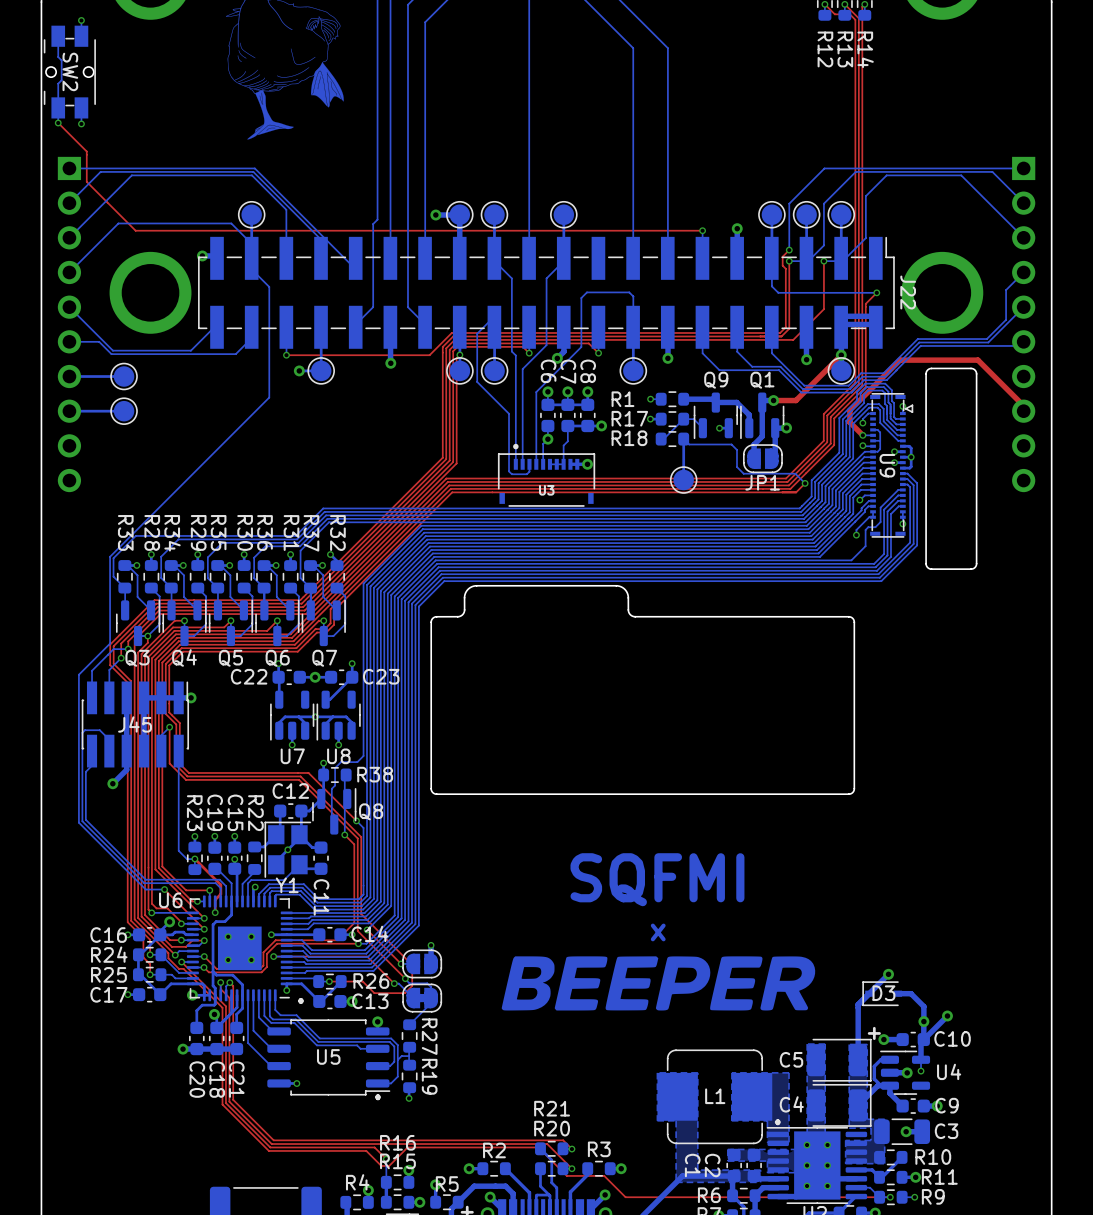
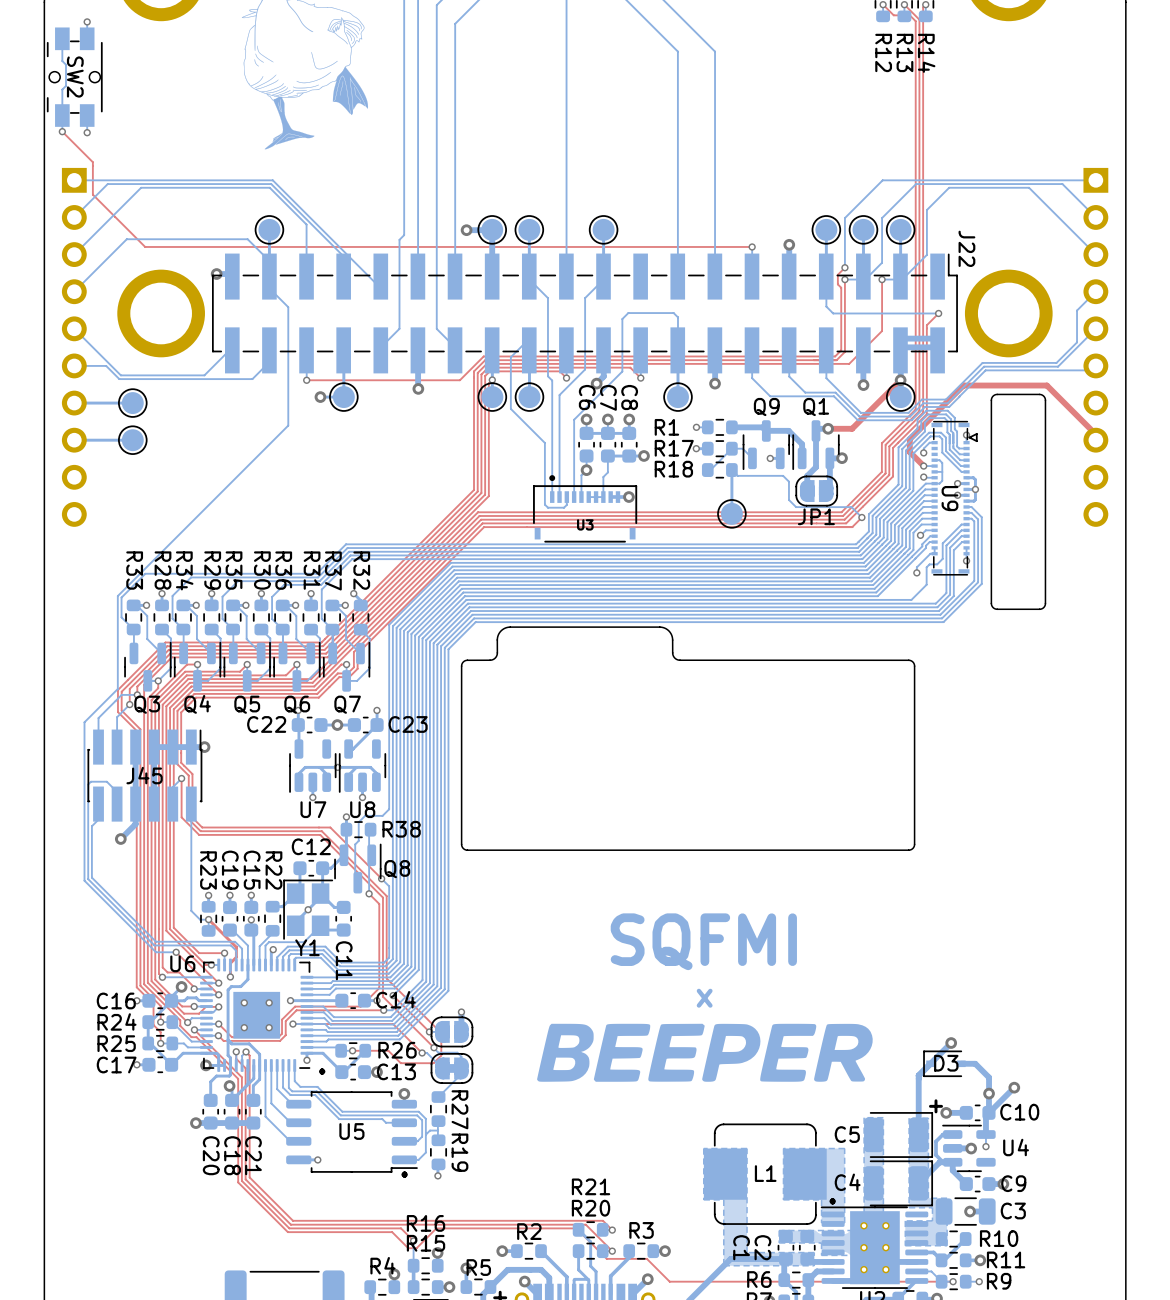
J22 name position: J22 (908, 292) -> J22 (966, 248)

